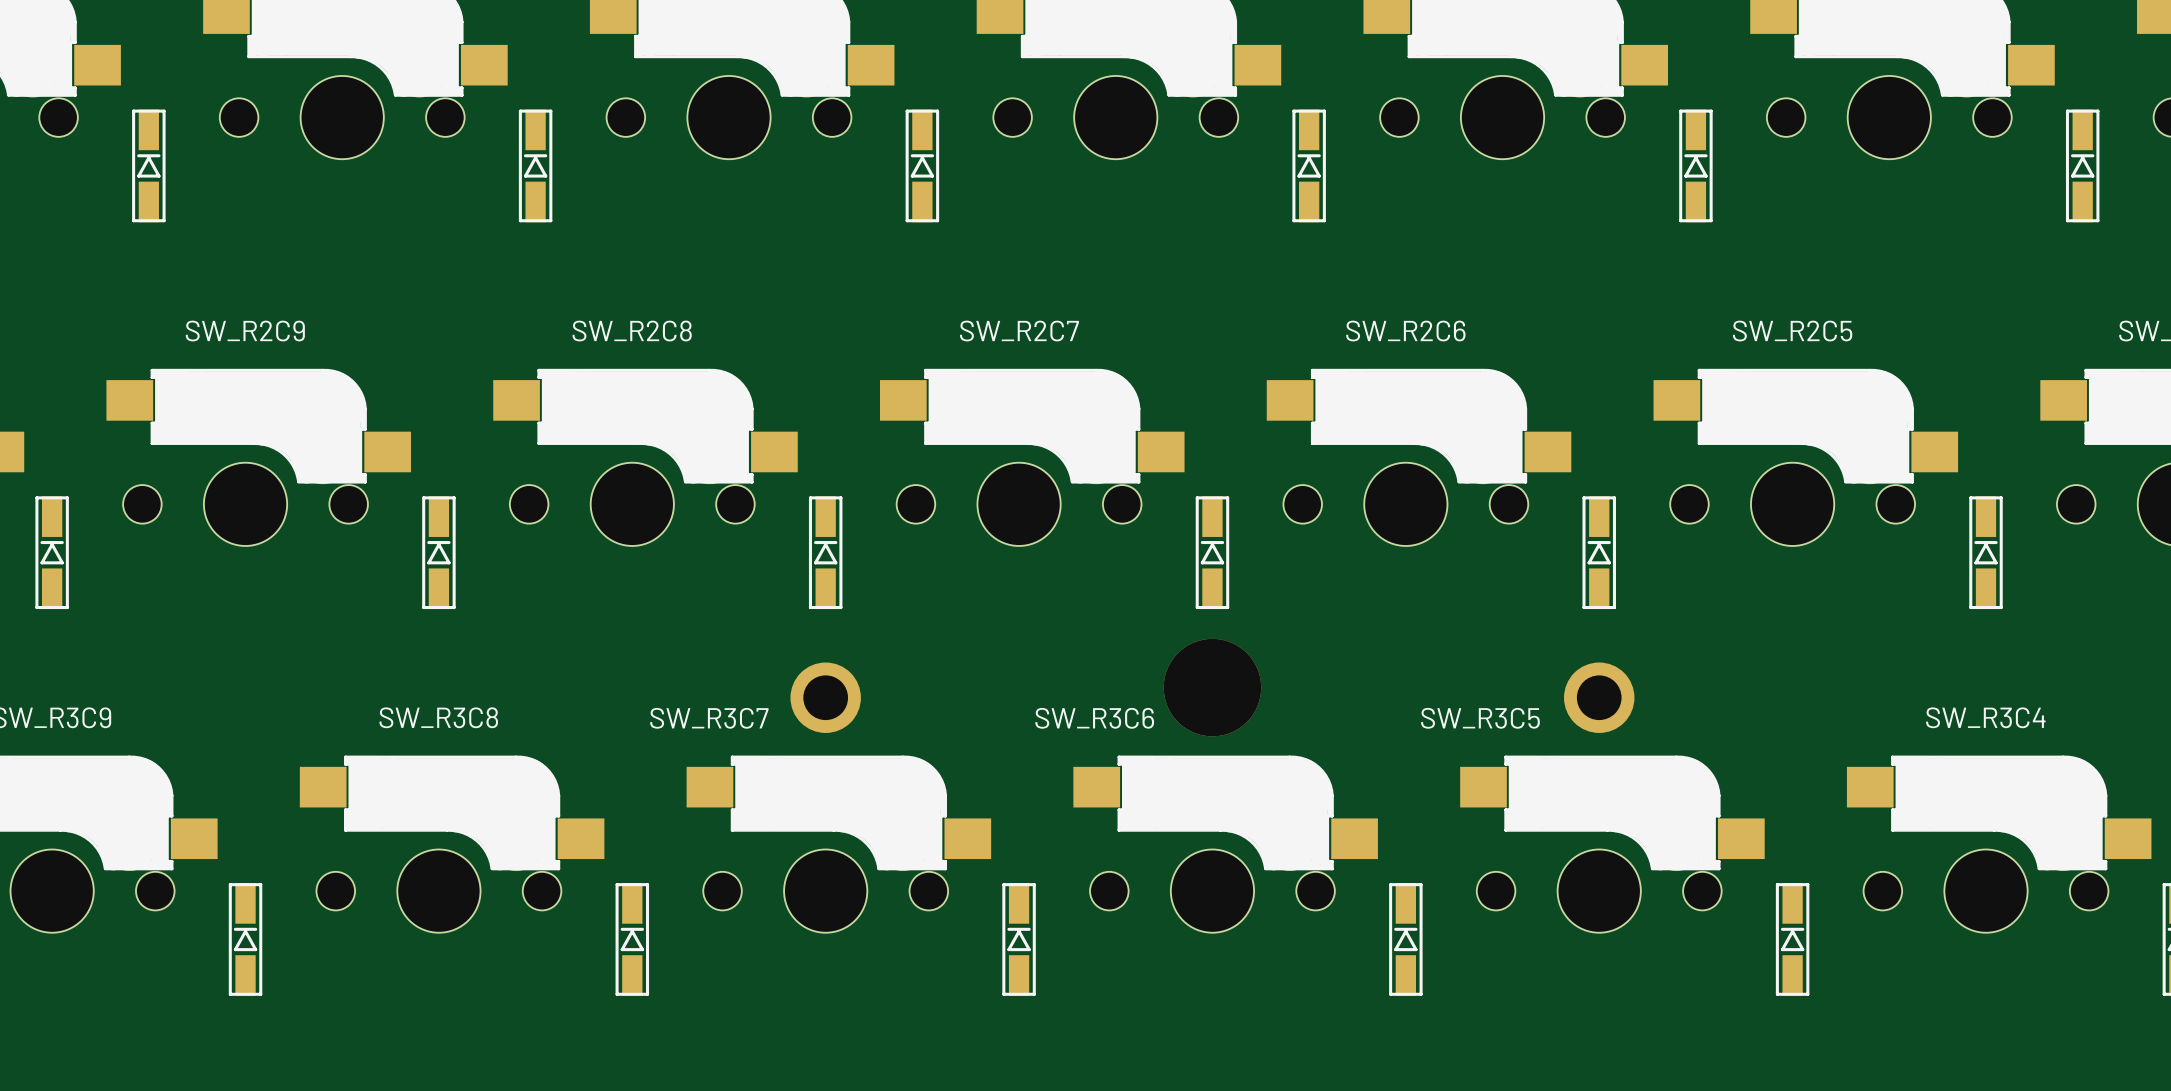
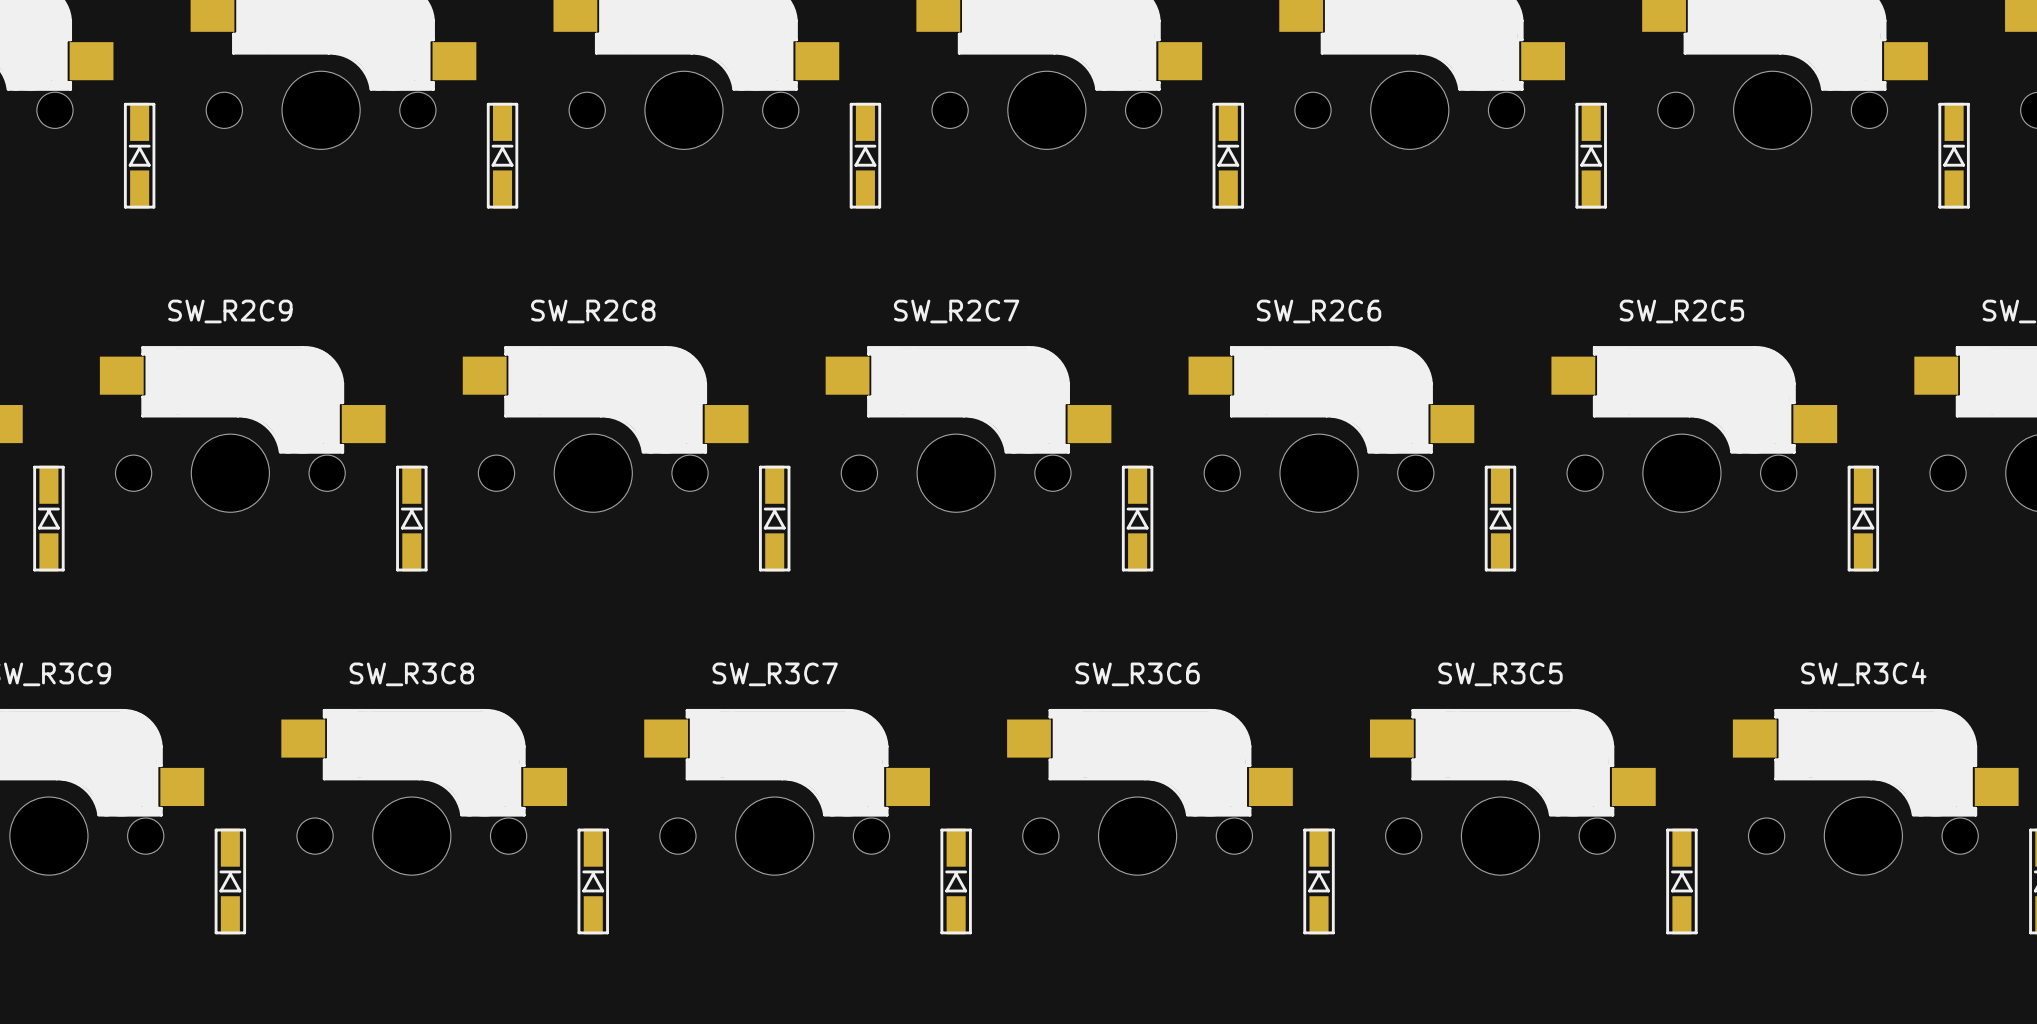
part: (1212, 687) -> none
part: (825, 697) -> none
part: (1599, 697) -> none
SW_R3C7 name position: SW_R3C7 (709, 718) -> SW_R3C7 (775, 674)
SW_R3C6 name position: SW_R3C6 (1094, 718) -> SW_R3C6 (1137, 674)
SW_R3C5 name position: SW_R3C5 (1480, 718) -> SW_R3C5 (1500, 674)

